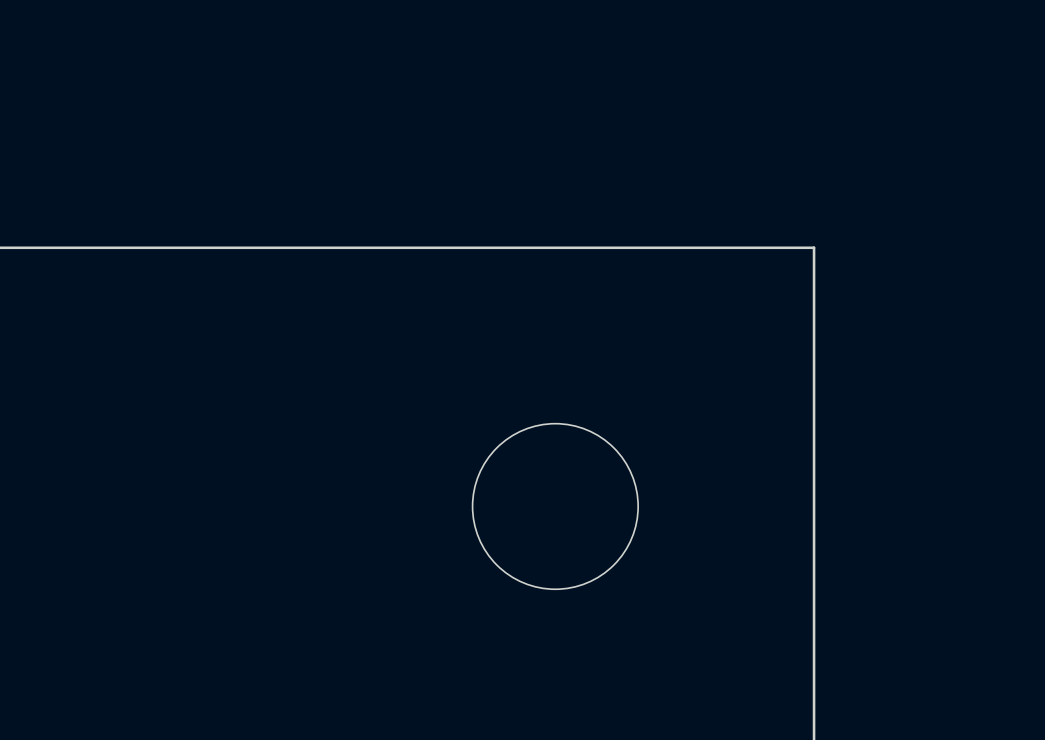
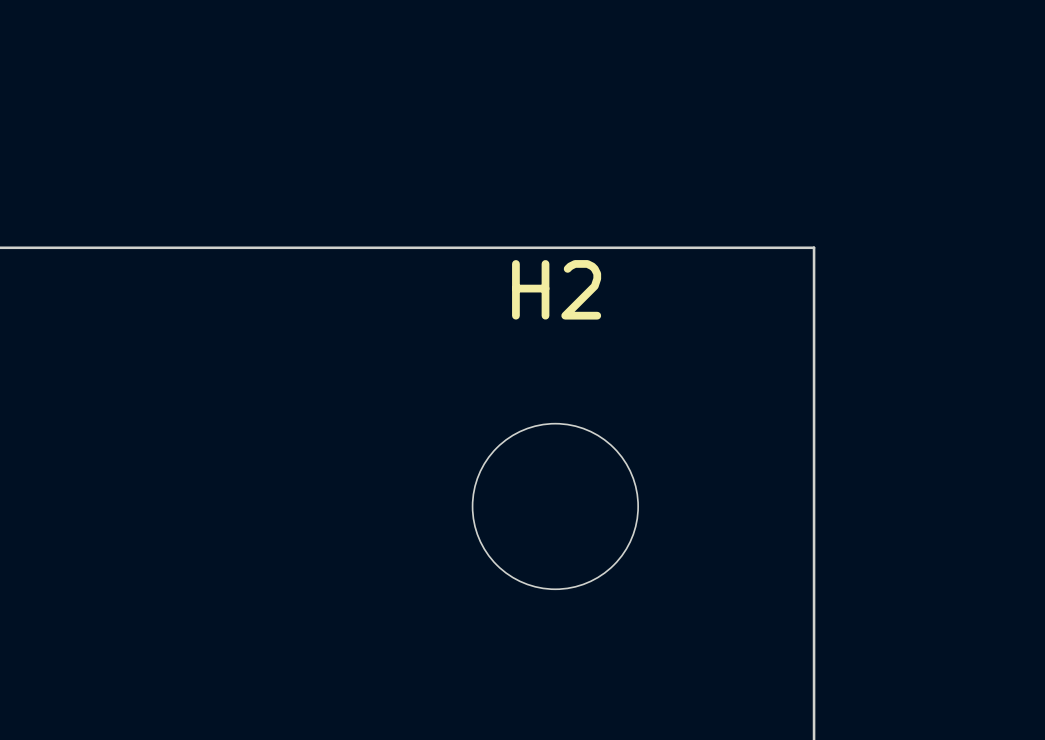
H2 name: none -> H2 (556, 289)

